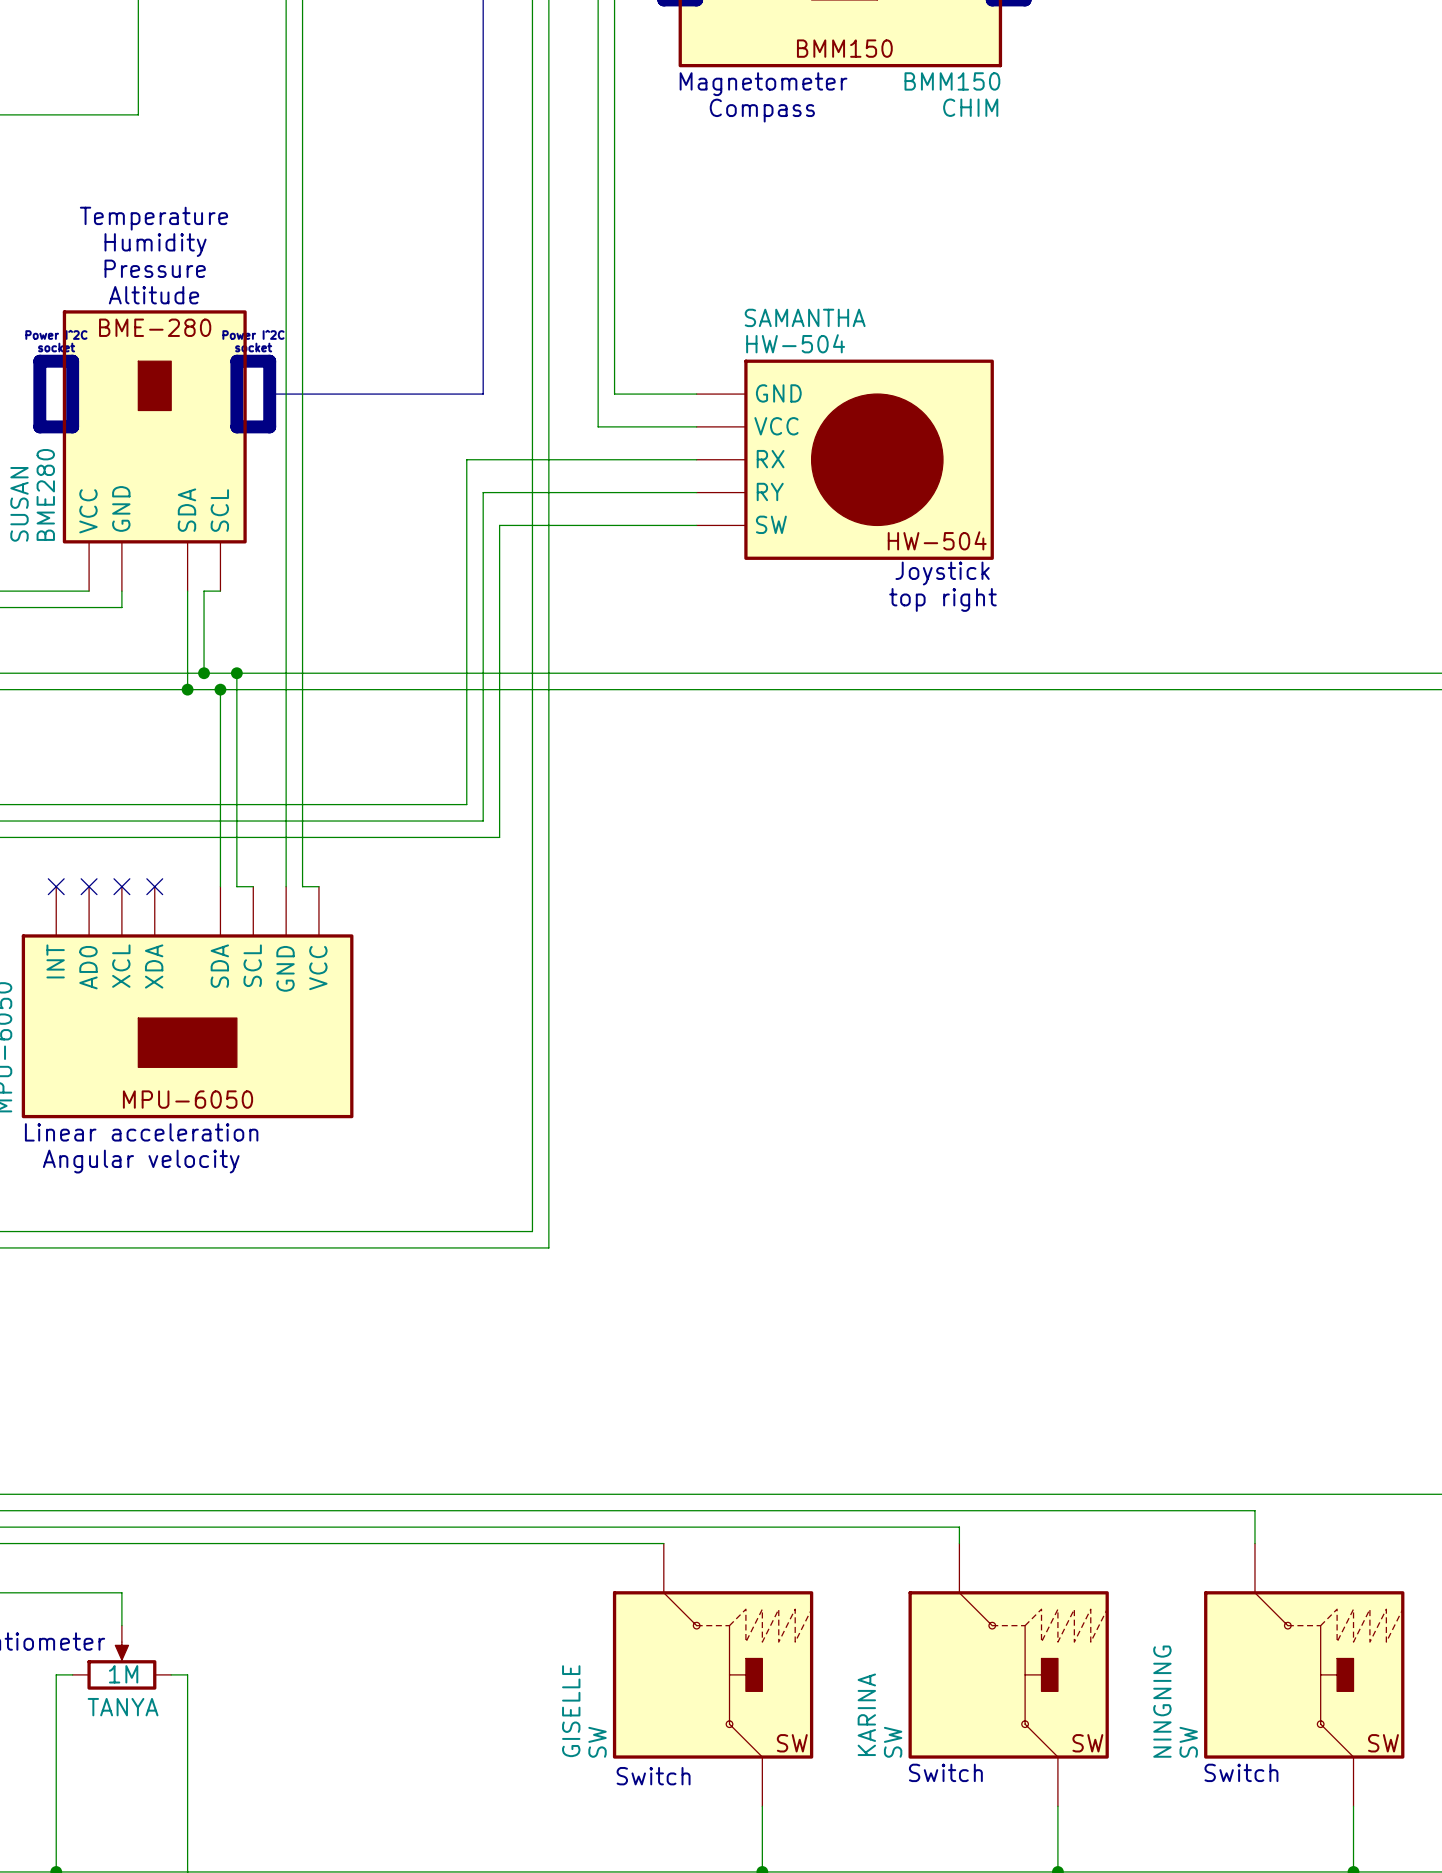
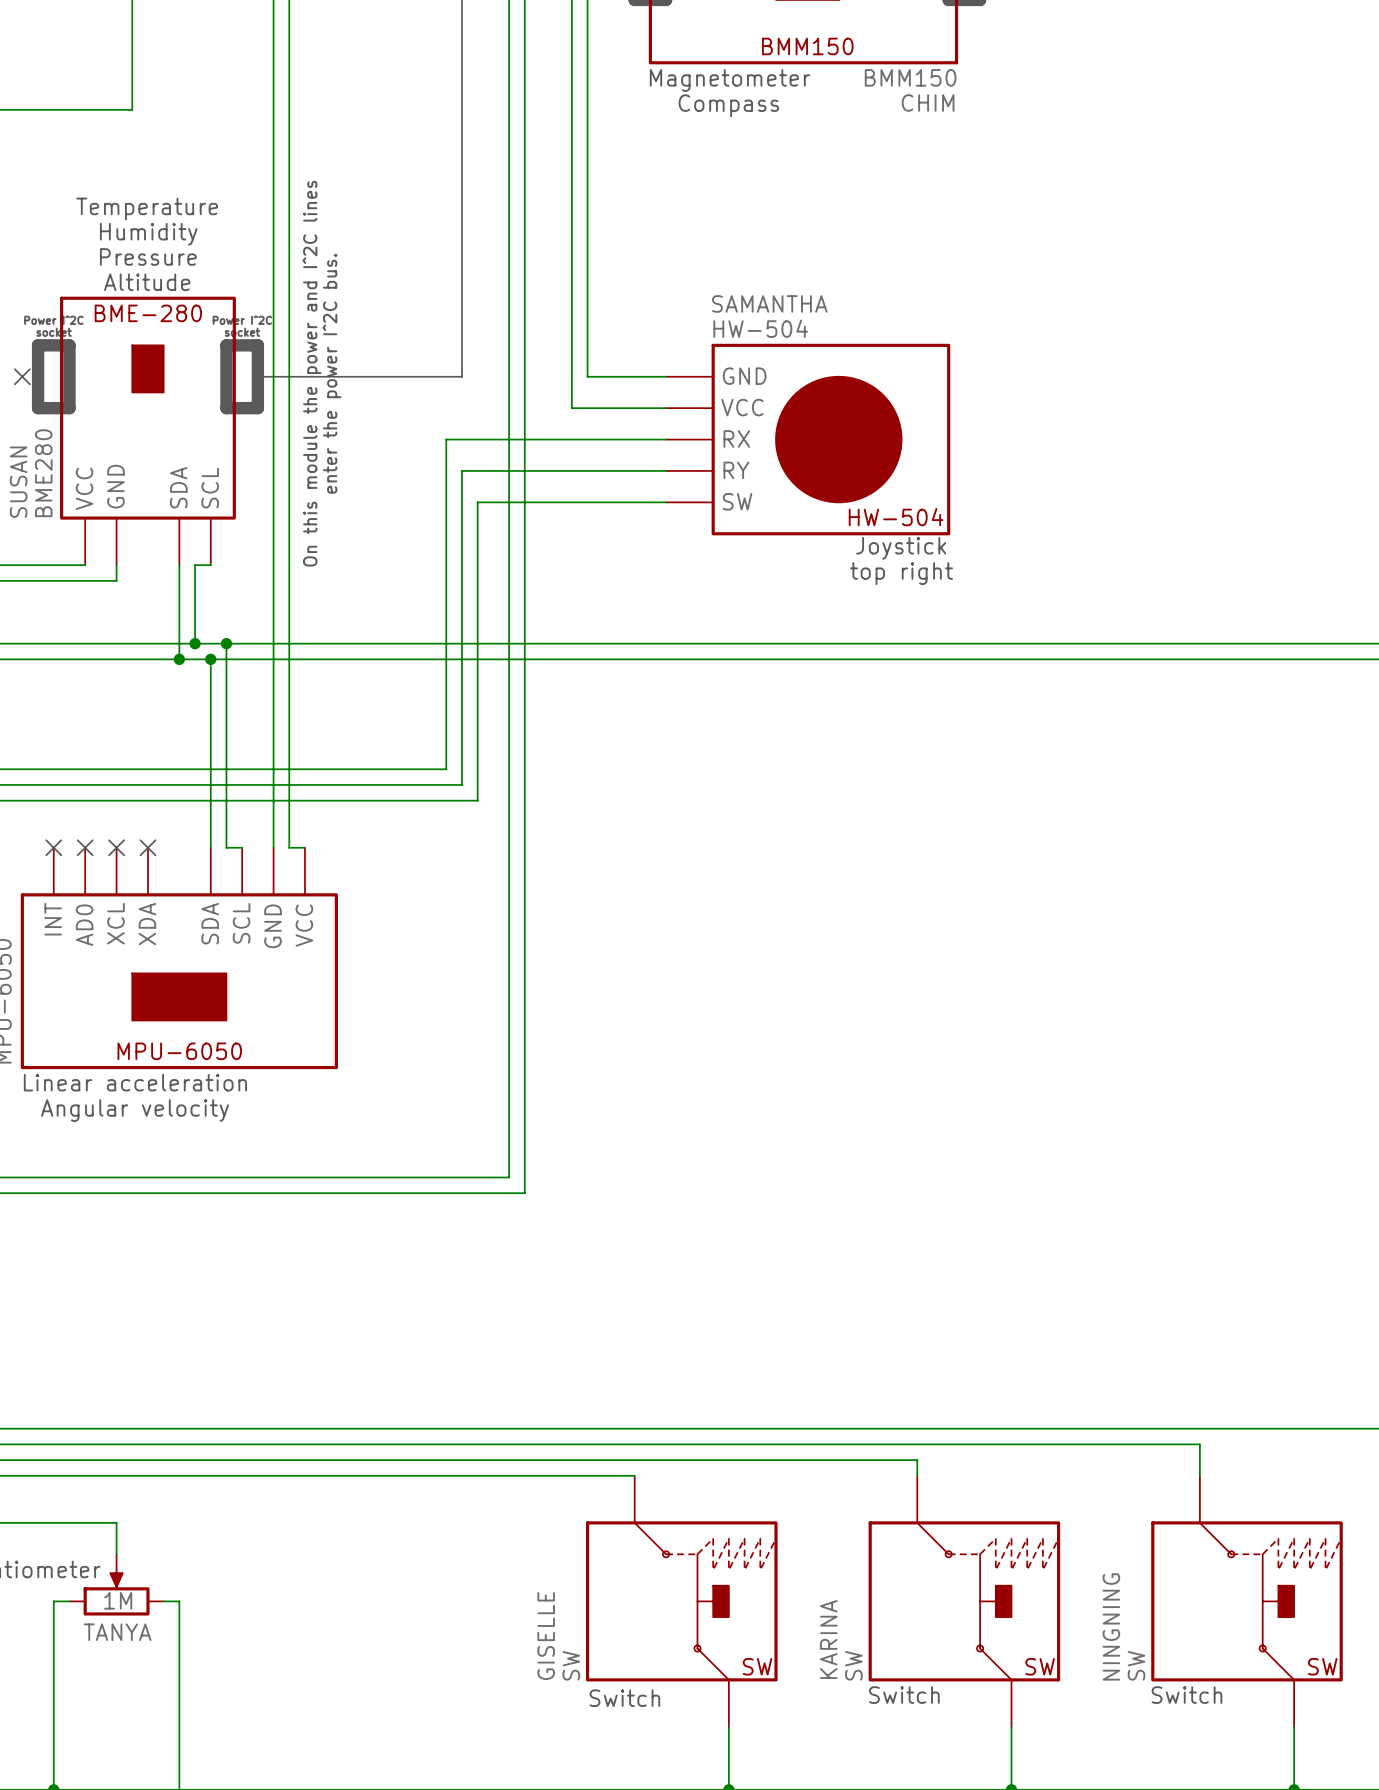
text: none -> On this module the power and I^2C lines (312, 373)
text: none -> enter the power I^2C bus. (331, 373)
no-connect mark: none -> (22, 376)

